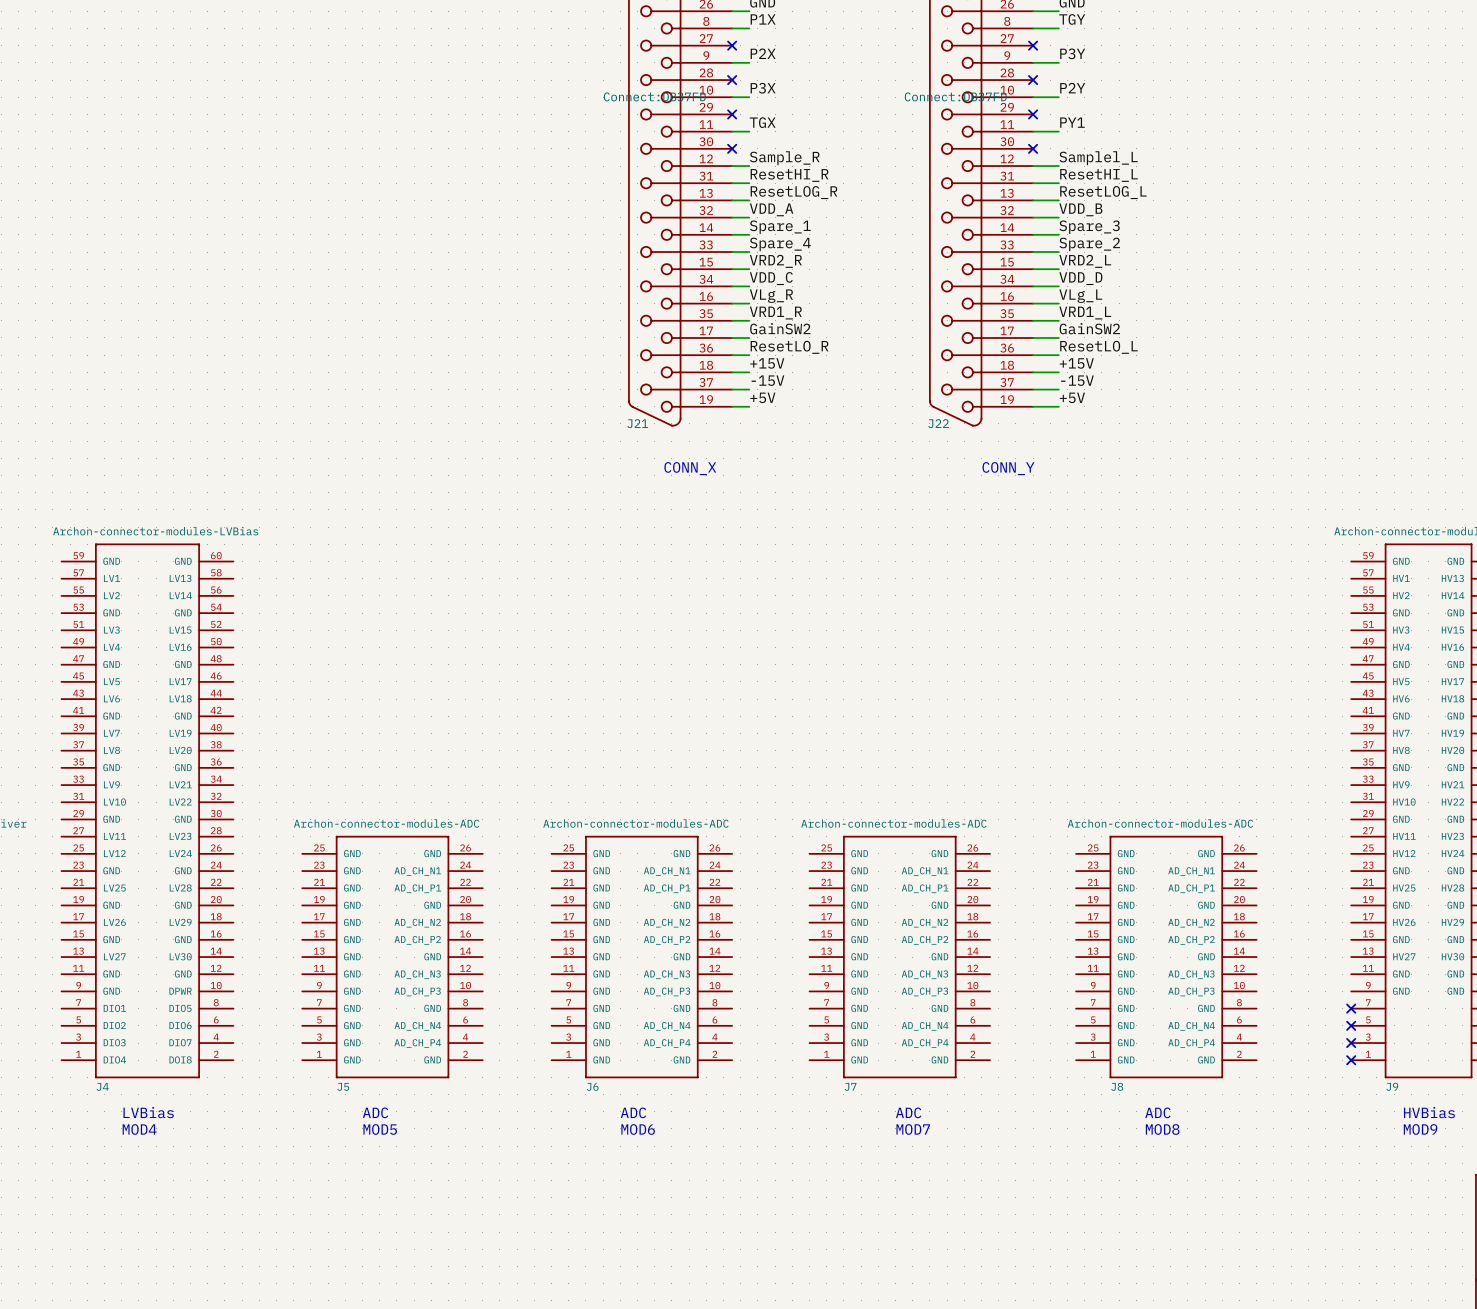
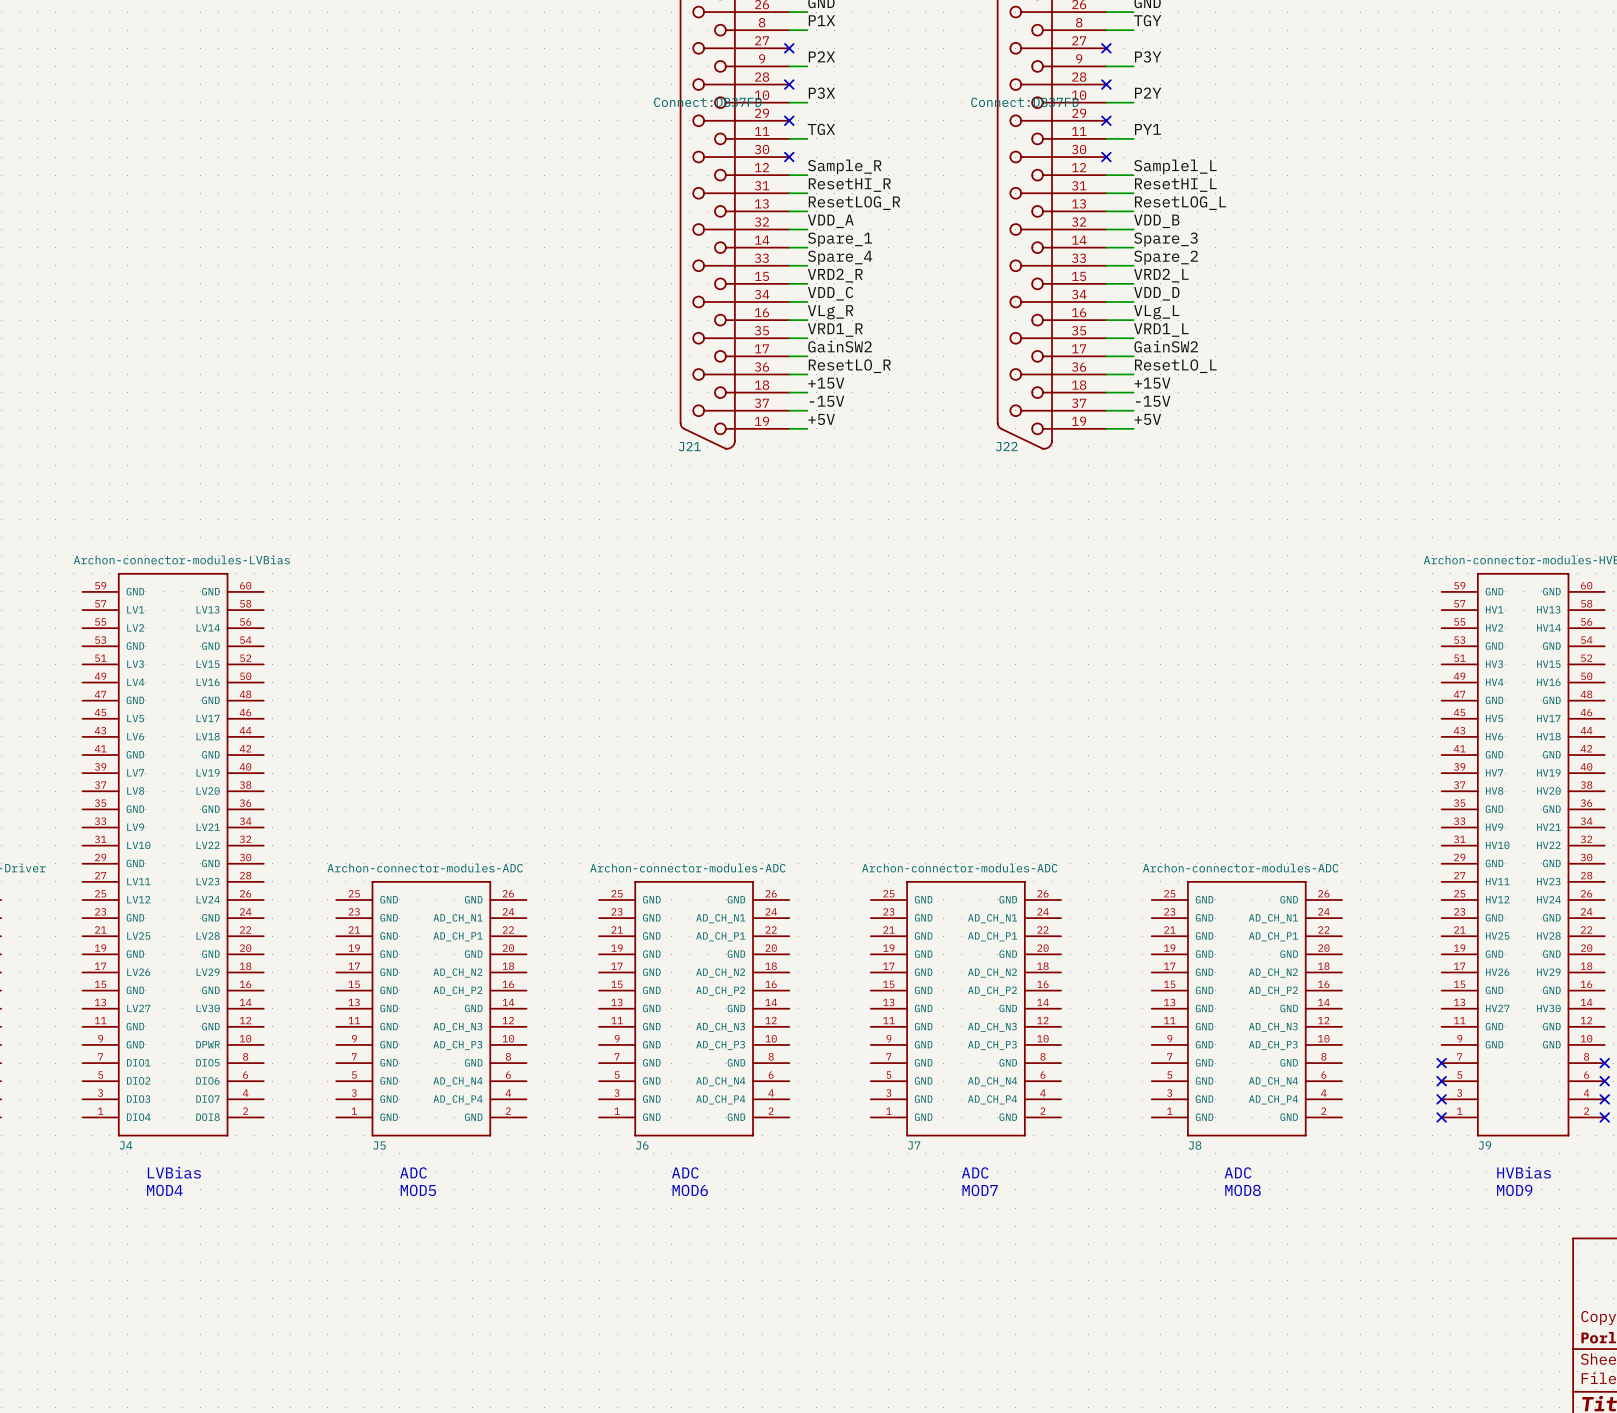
text: CONN_X (690, 468) -> none
text: CONN_Y (1008, 468) -> none

